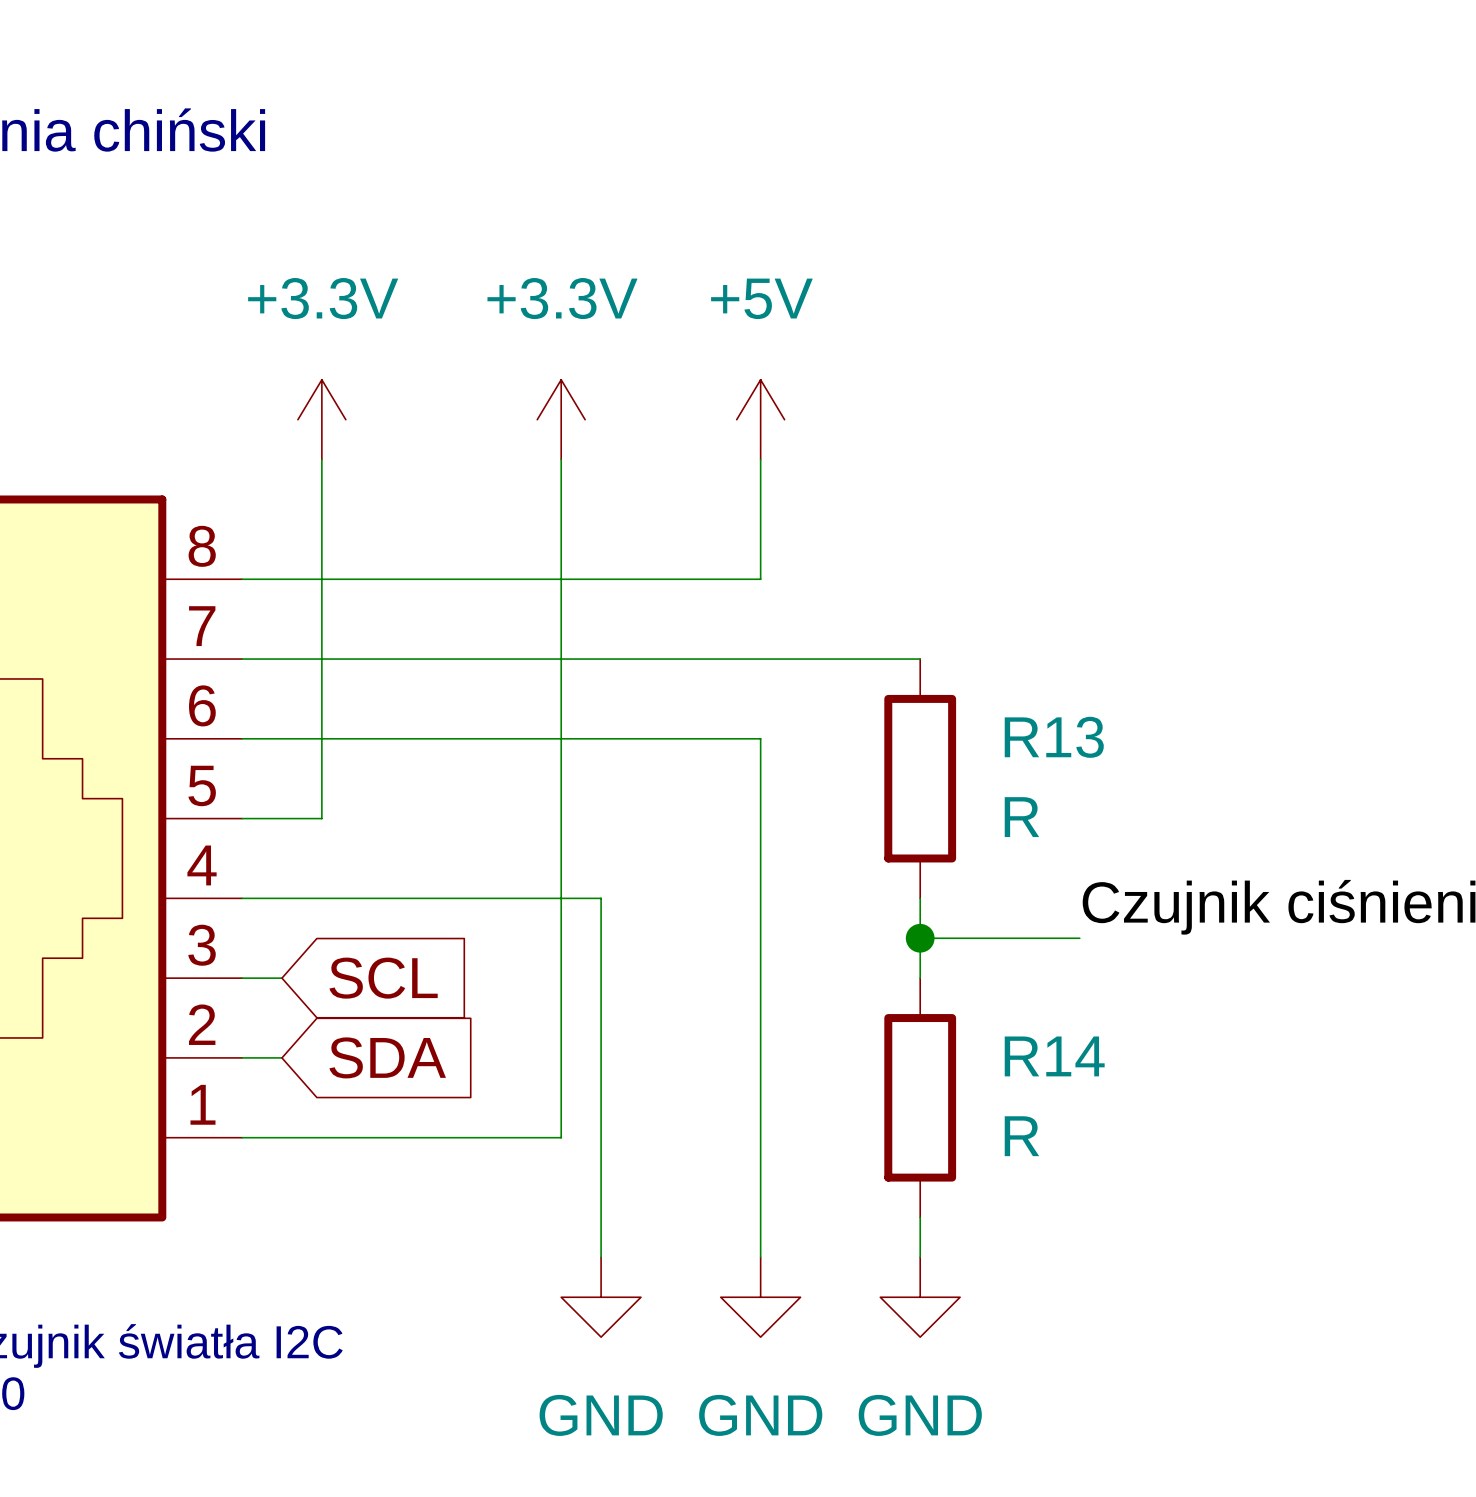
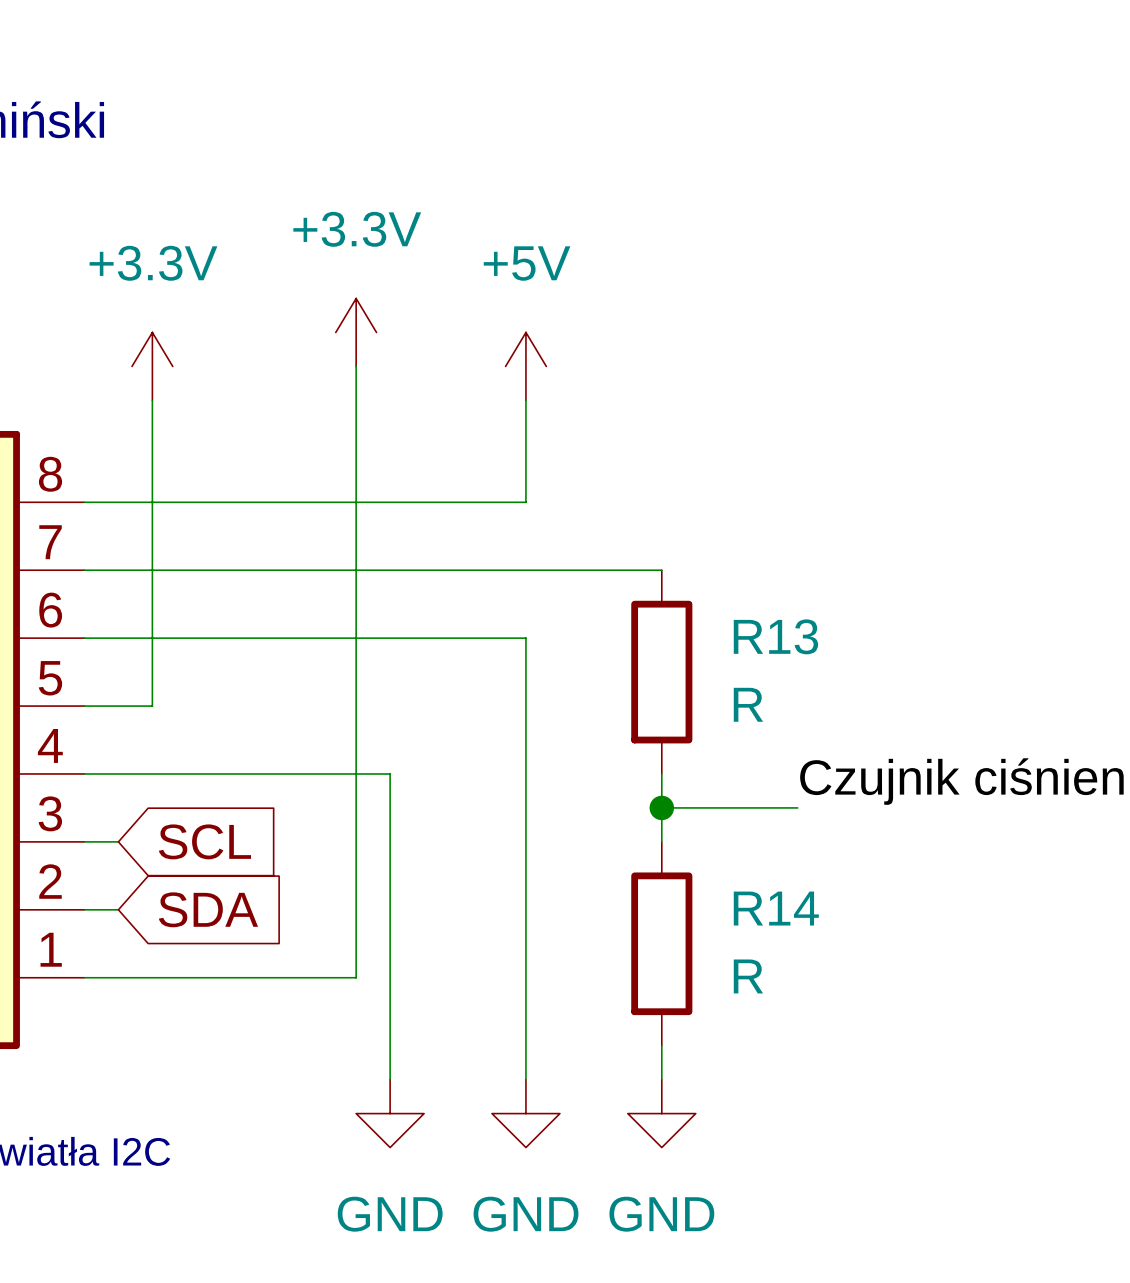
power symbol position: +3.3V (561, 419) -> +3.3V (356, 332)

